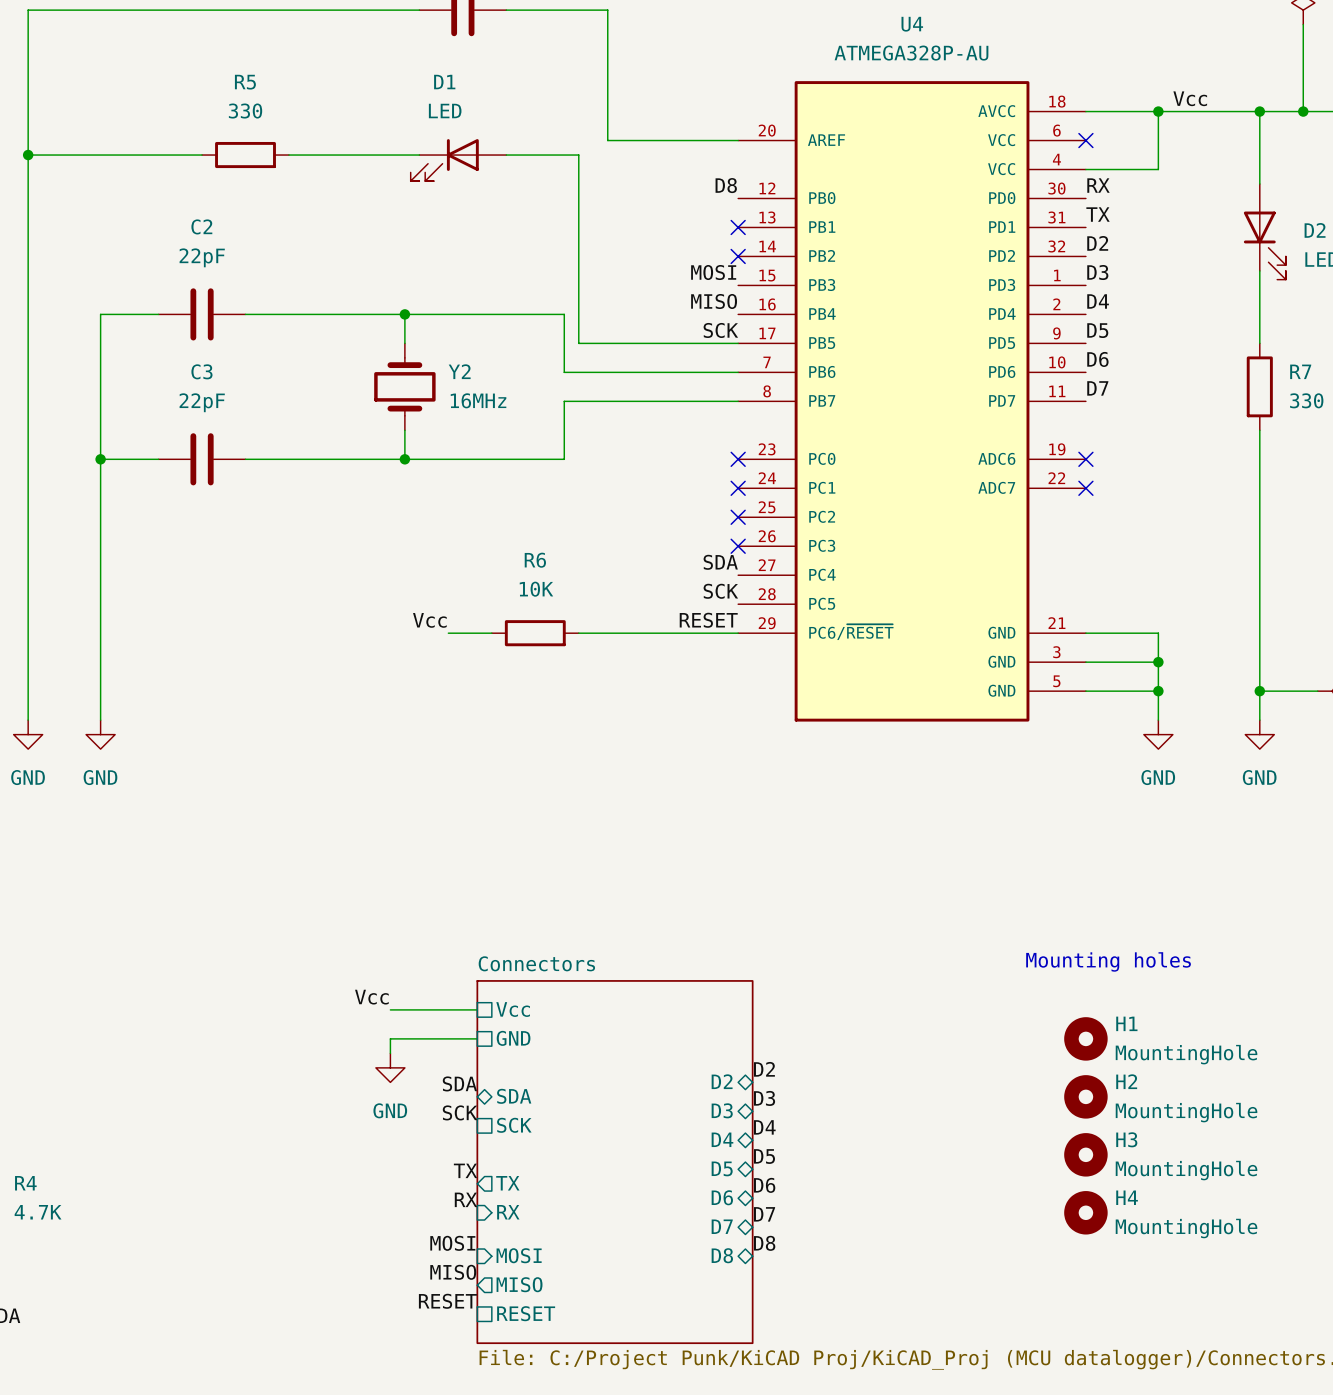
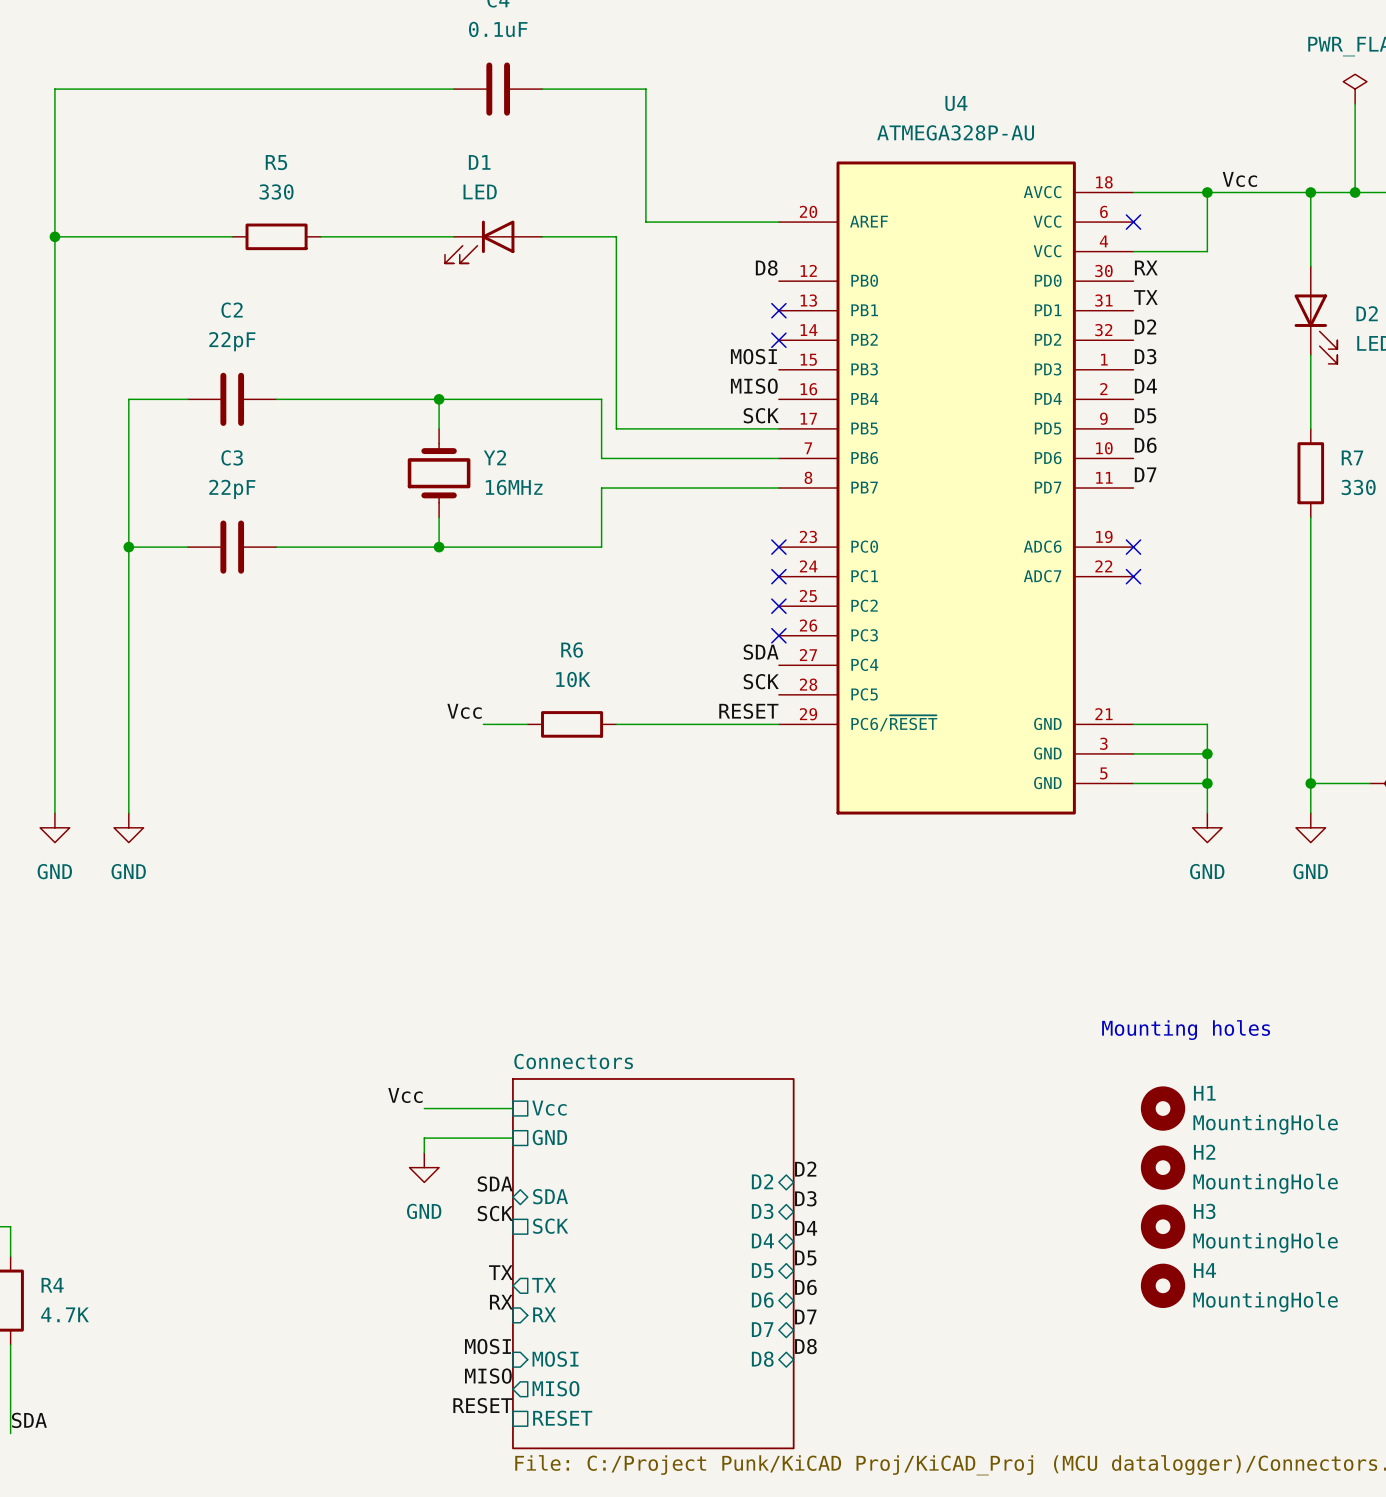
text position: Mounting holes (1108, 961) -> Mounting holes (1186, 1030)
H1 position: (1085, 1038) -> (1163, 1108)
H2 position: (1085, 1096) -> (1163, 1167)
H3 position: (1085, 1154) -> (1163, 1226)
H4 position: (1085, 1212) -> (1163, 1285)

